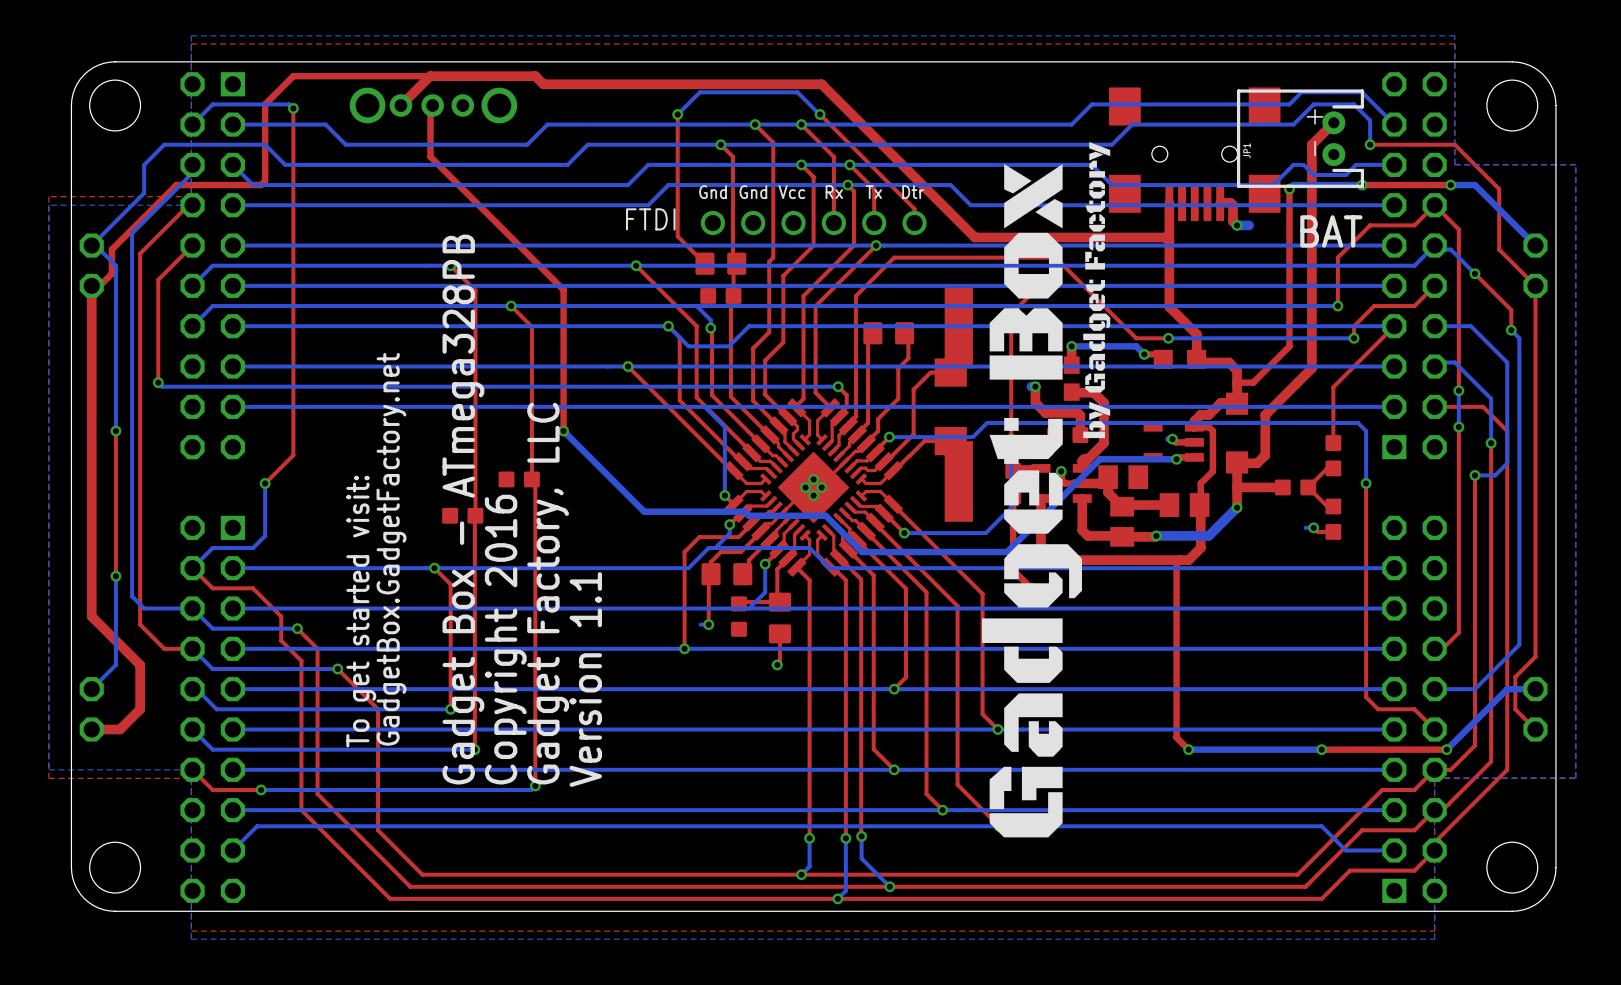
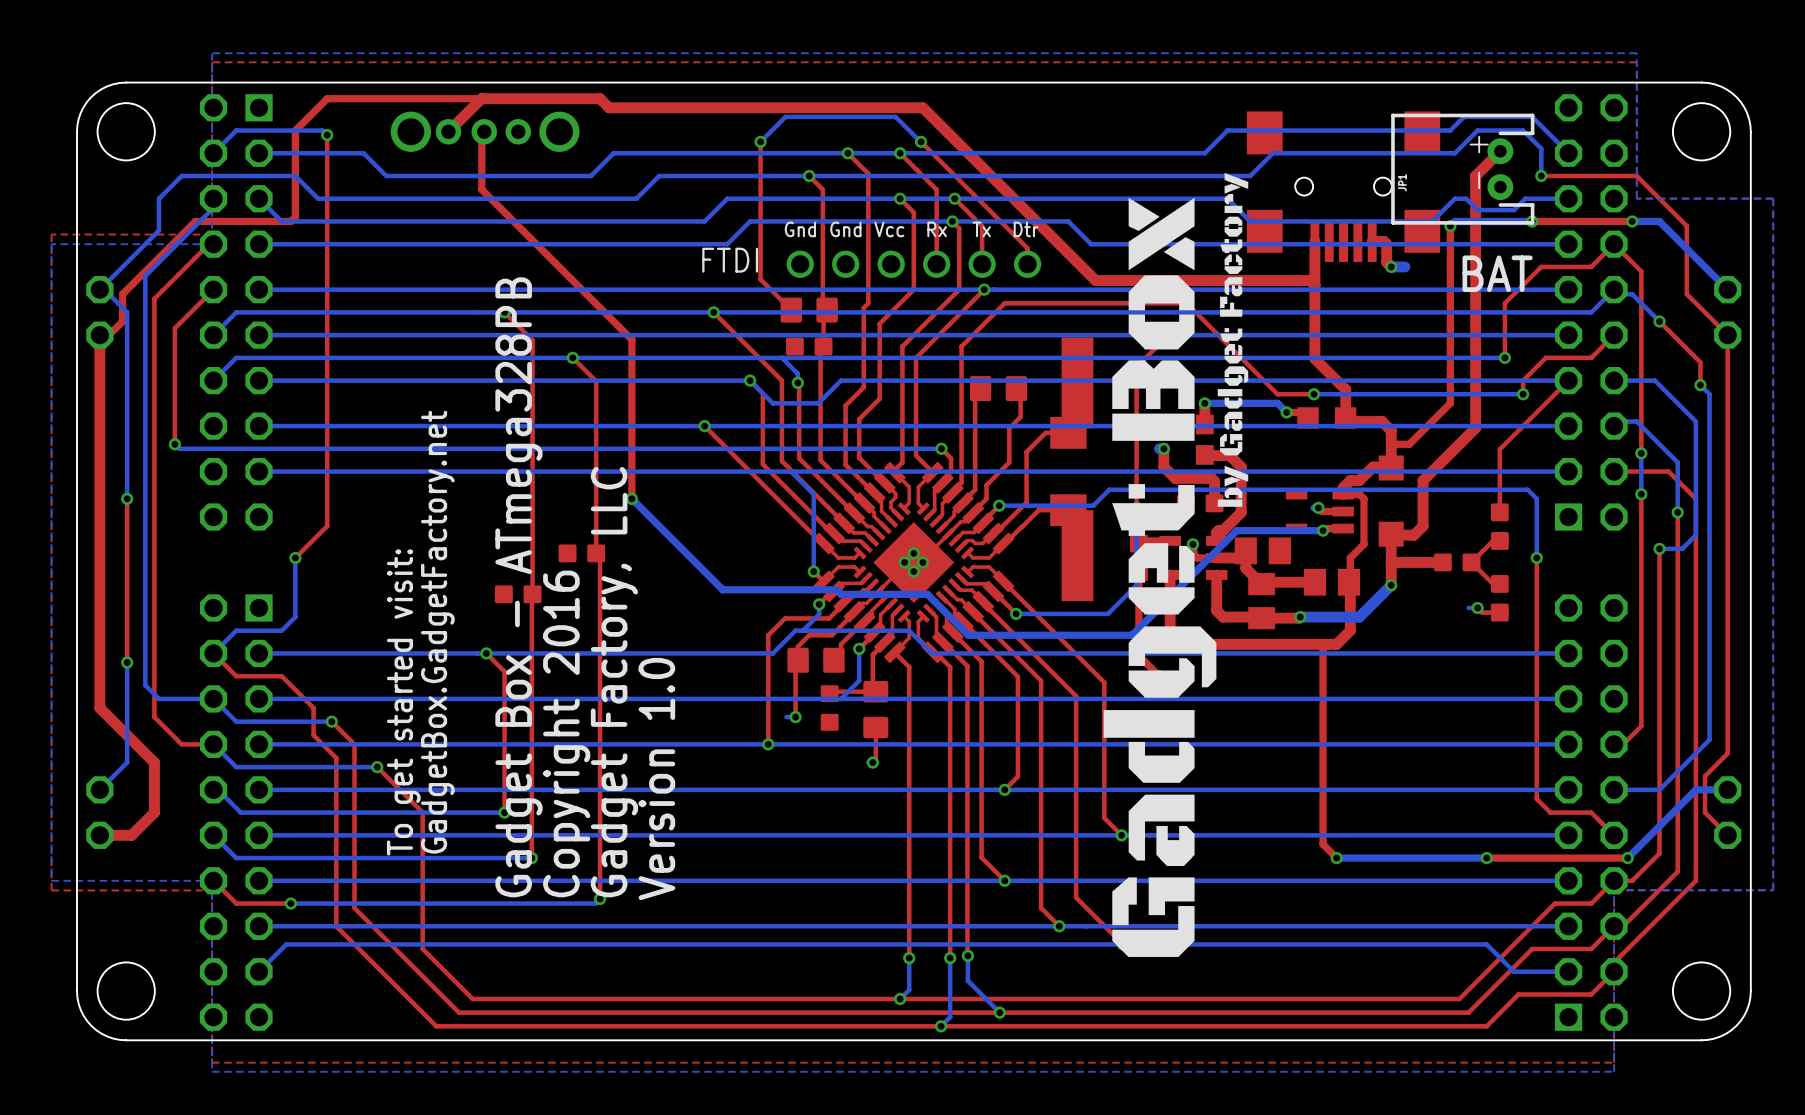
text: Version 1.1 (585, 679) -> Version 1.0 (656, 778)

